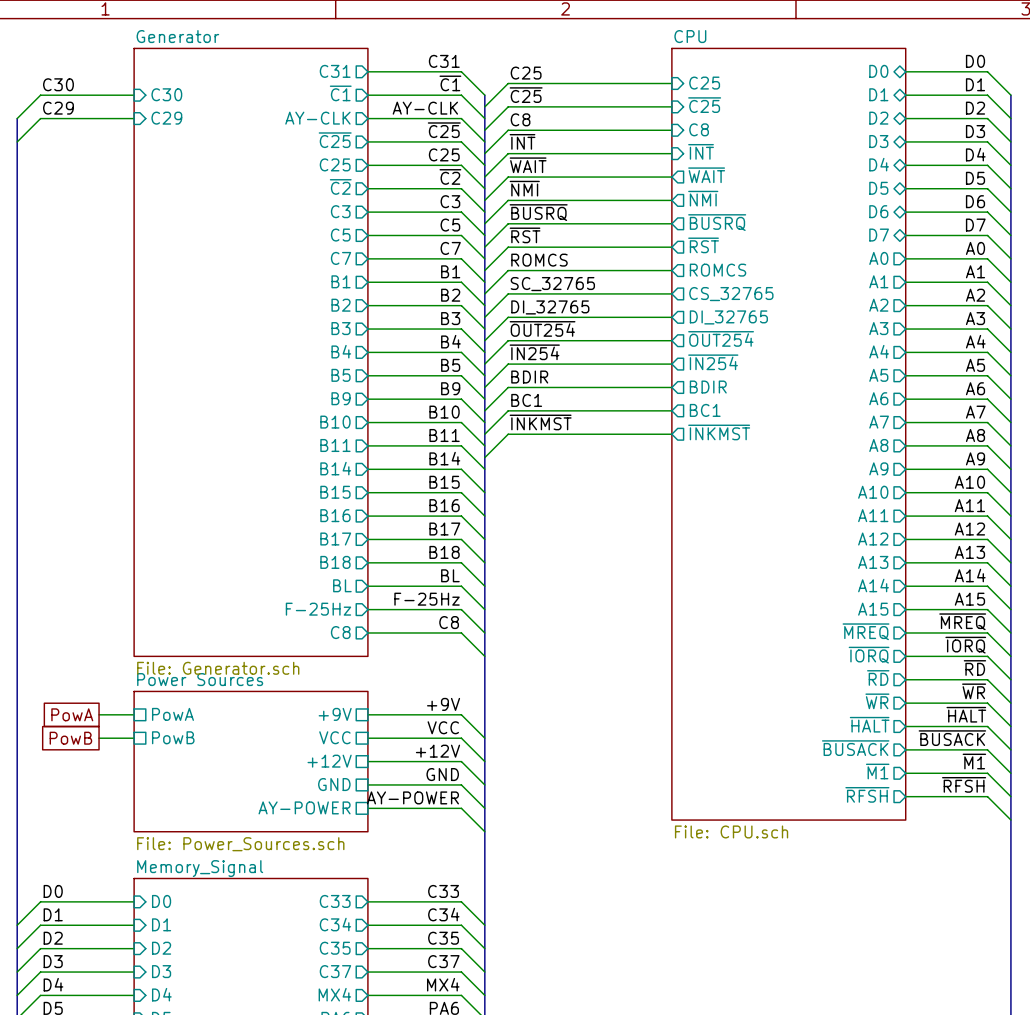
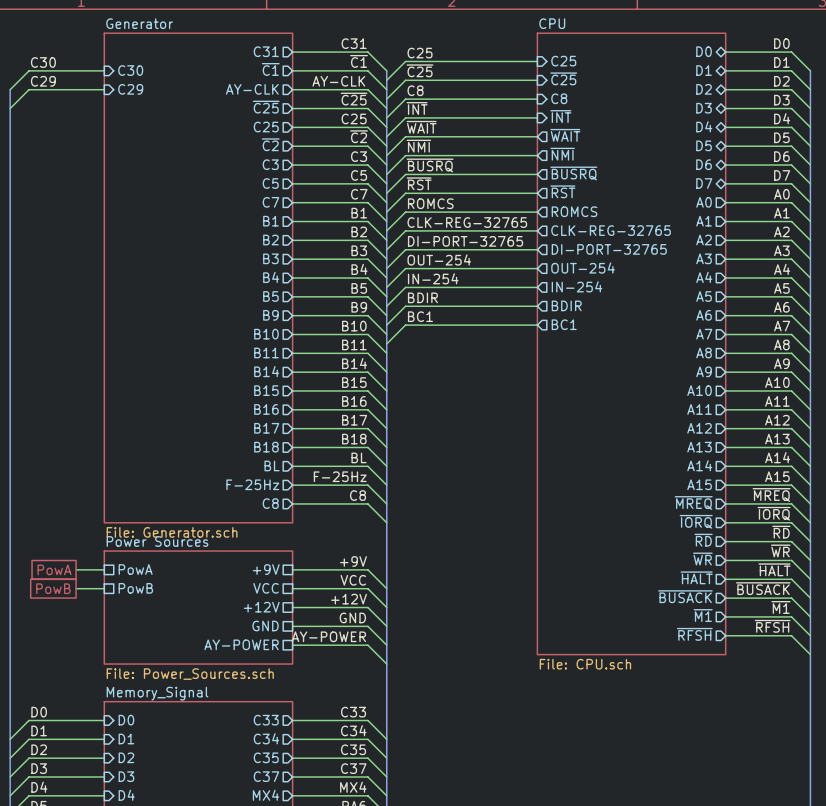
label: SC_32765 (552, 284) -> CLK-REG-32765 (467, 222)
sheet pin: CS_32765 (731, 294) -> CLK-REG-32765 (611, 230)
label: DI_32765 (550, 307) -> DI-PORT-32765 (465, 241)
sheet pin: DI_32765 (728, 317) -> DI-PORT-32765 (609, 249)
label: ~{OUT254} (542, 328) -> OUT-254 (439, 259)
sheet pin: ~{OUT254} (721, 338) -> OUT-254 (583, 268)
label: ~{IN254} (534, 352) -> IN-254 (433, 278)
sheet pin: ~{IN254} (713, 362) -> IN-254 (576, 286)
label: ~{INKMST} (540, 422) -> none
sheet pin: ~{INKMST} (719, 432) -> none
wire: (671, 434) (508, 434) (484, 457) -> none

